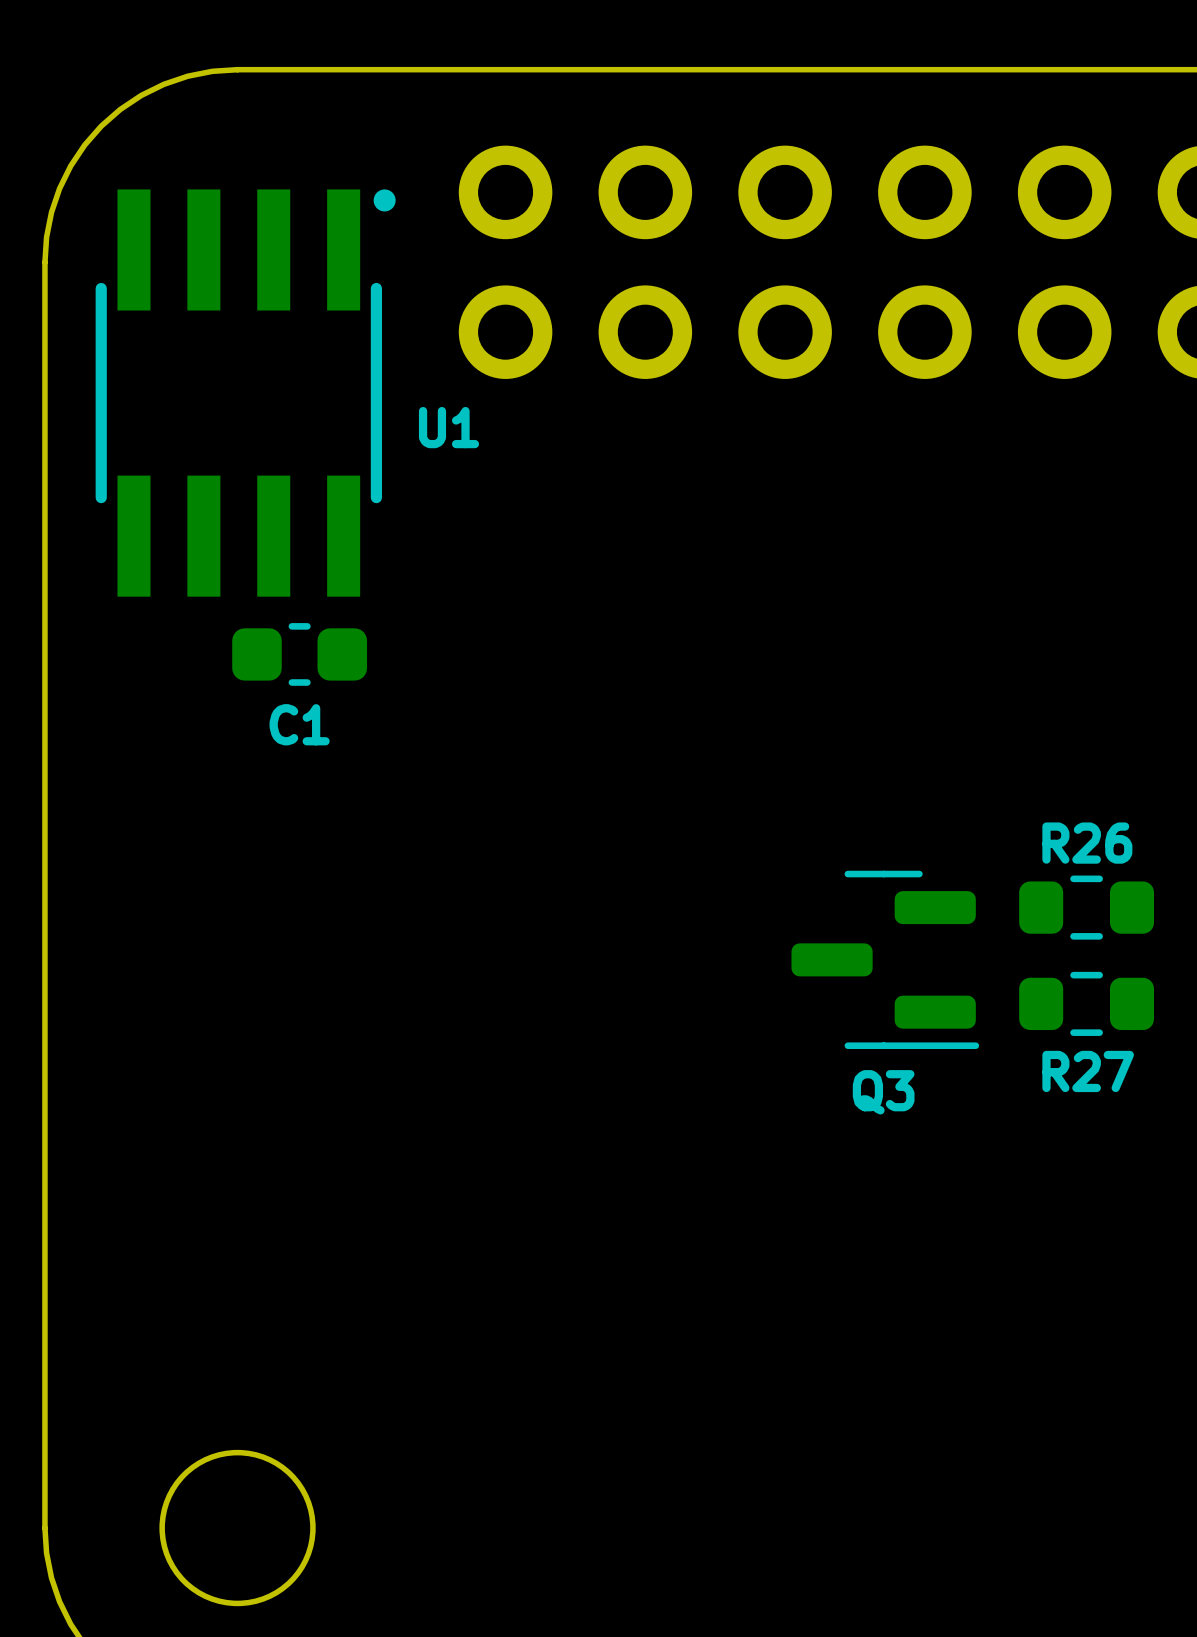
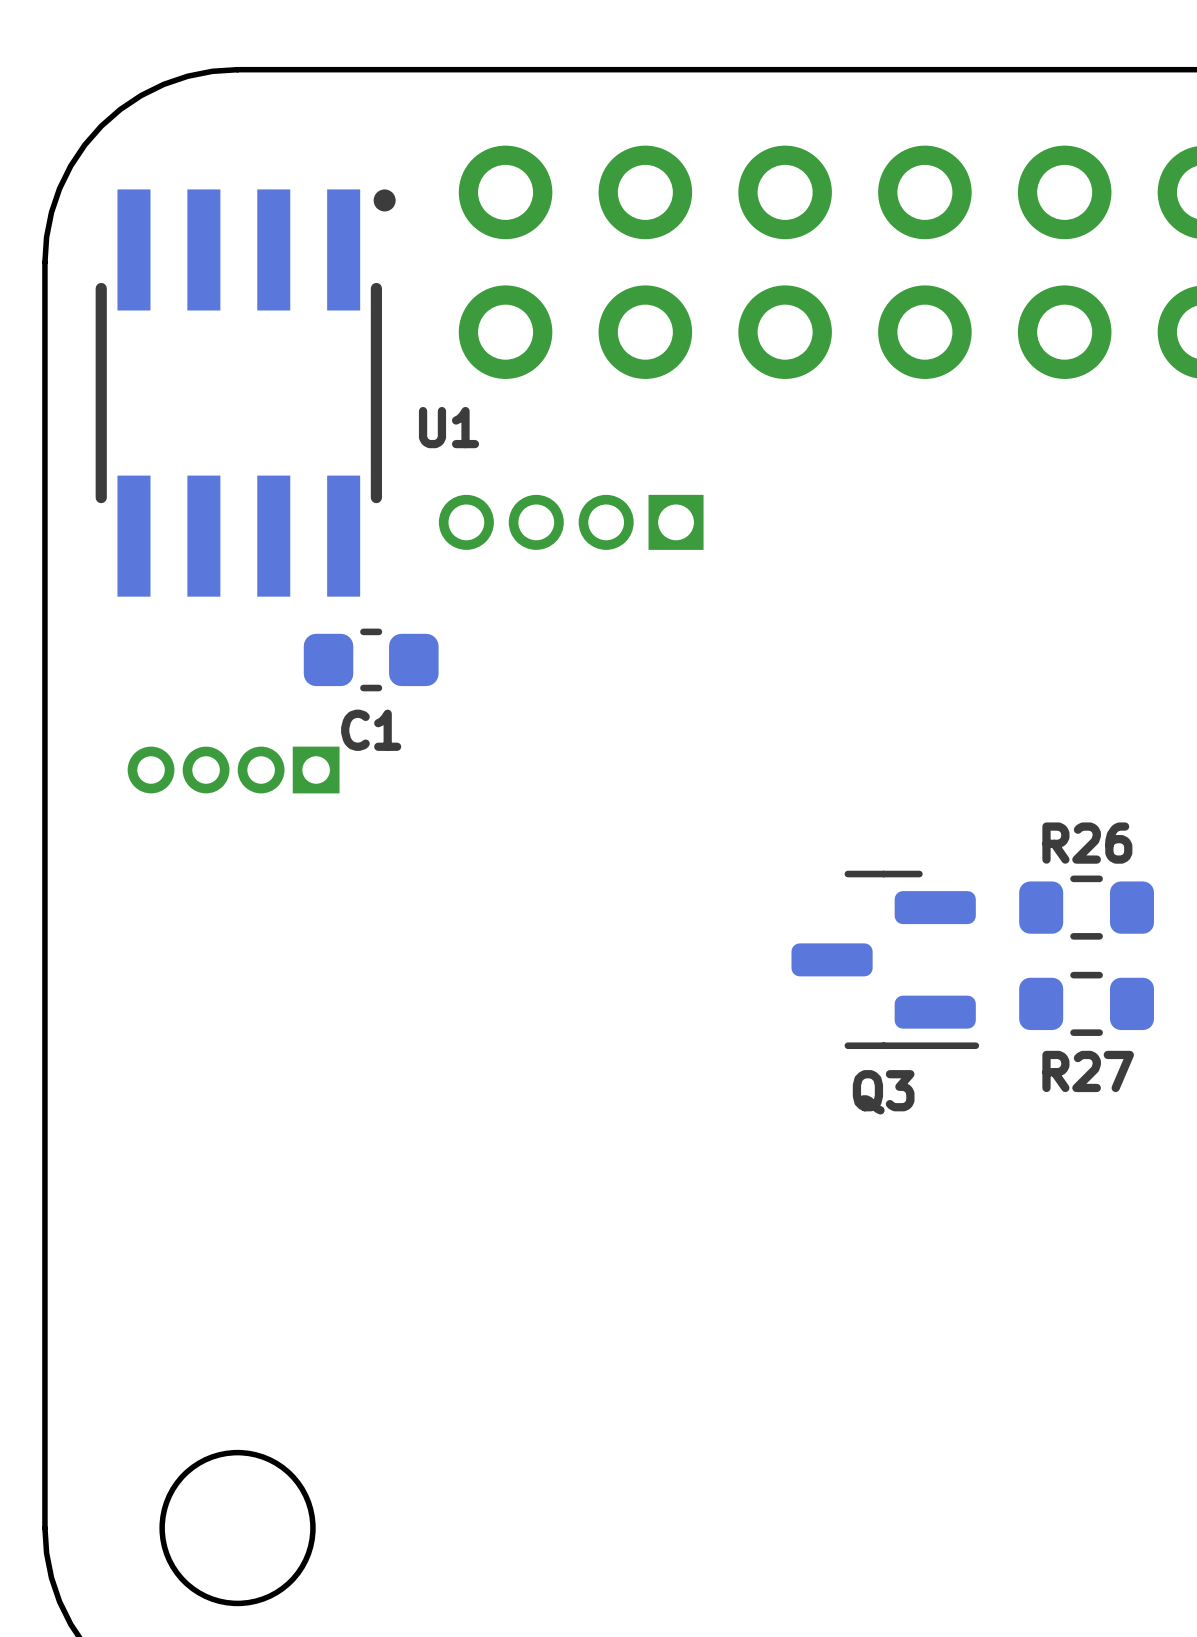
part: none -> (571, 522)
C1 position: (299, 654) -> (371, 659)
part: none -> (233, 770)

